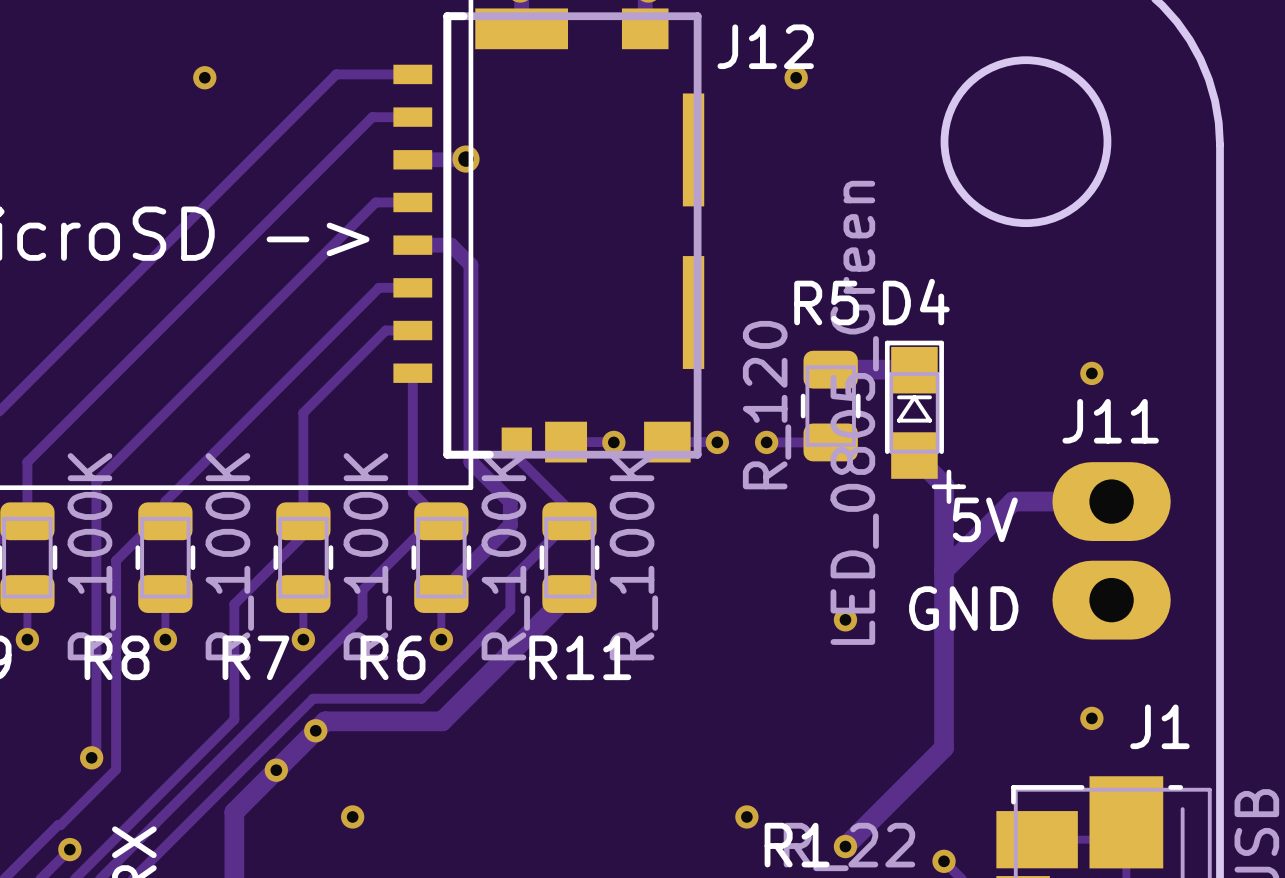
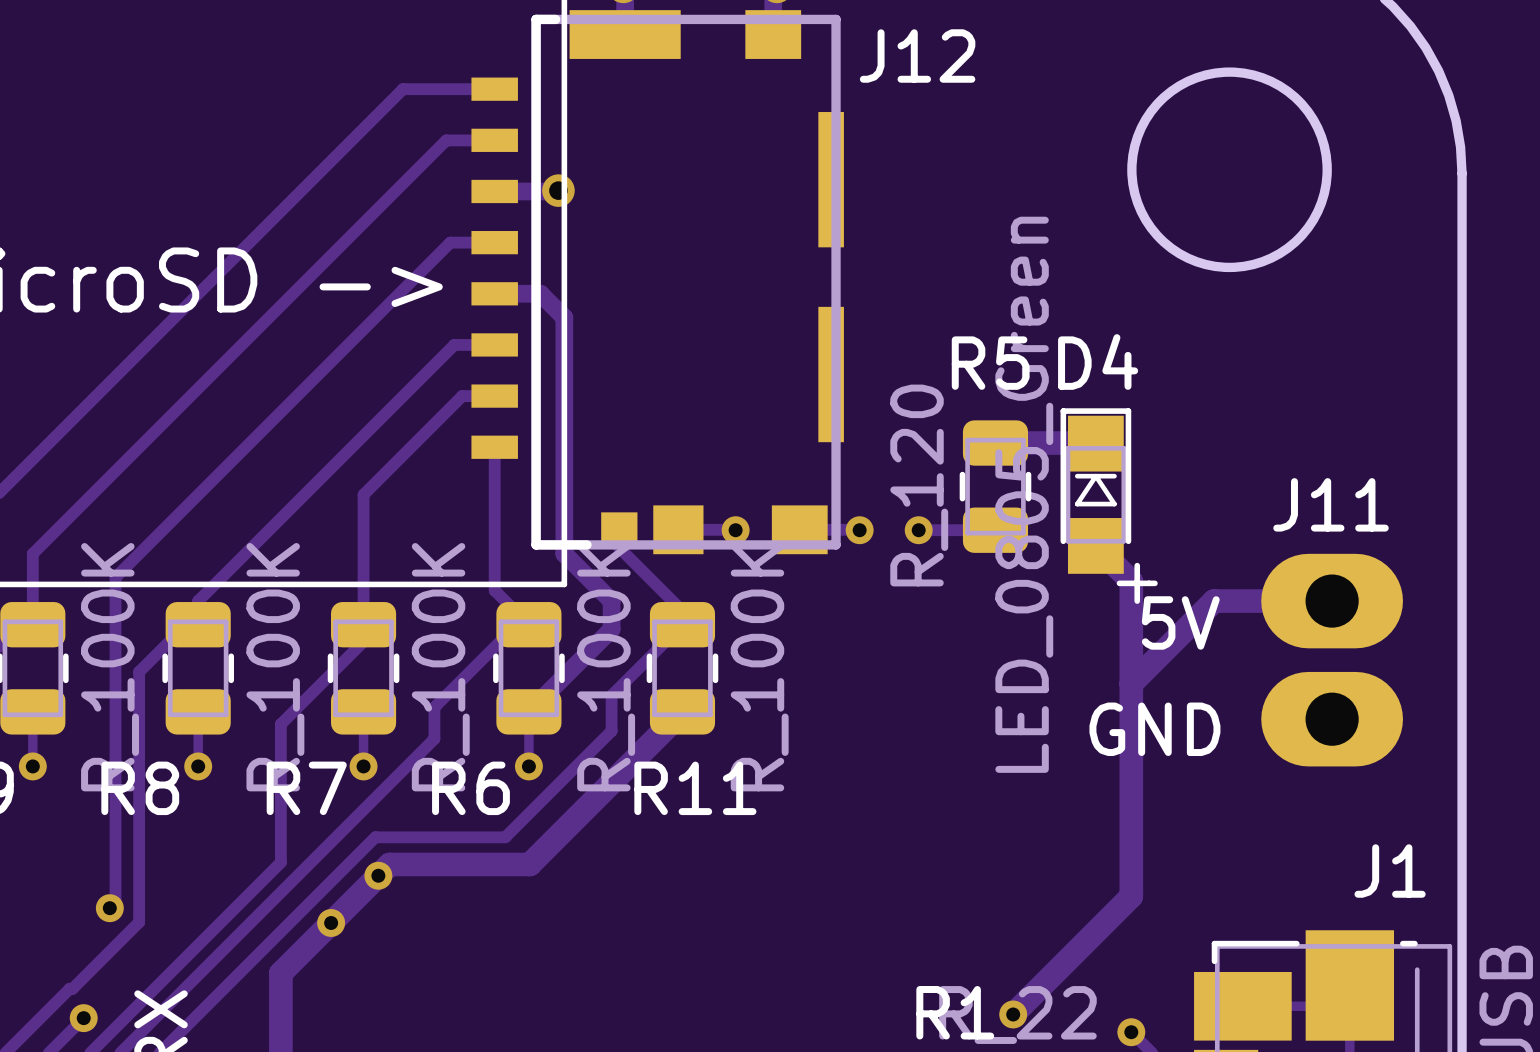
via: (204, 77) -> none
via: (796, 77) -> none
via: (1091, 373) -> none
via: (845, 619) -> none
via: (1091, 718) -> none
via: (352, 816) -> none
via: (746, 816) -> none

